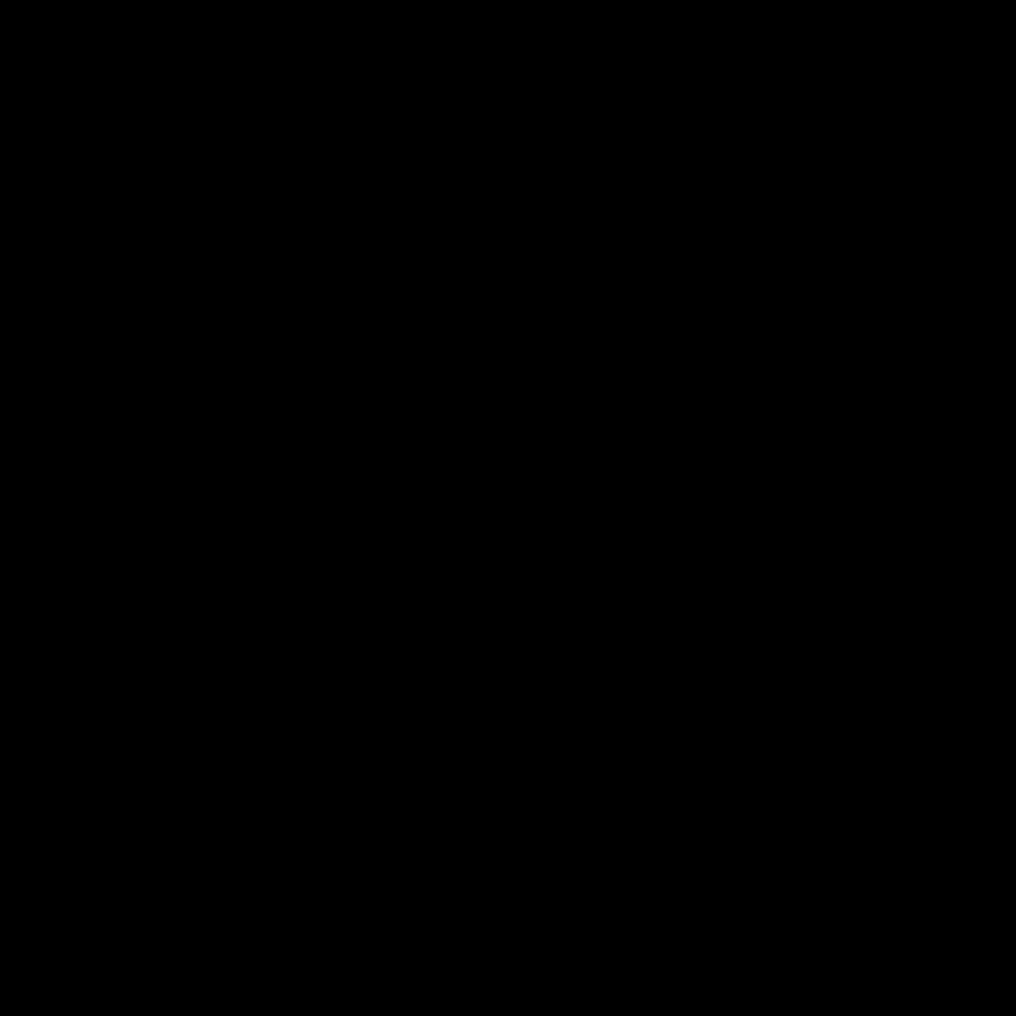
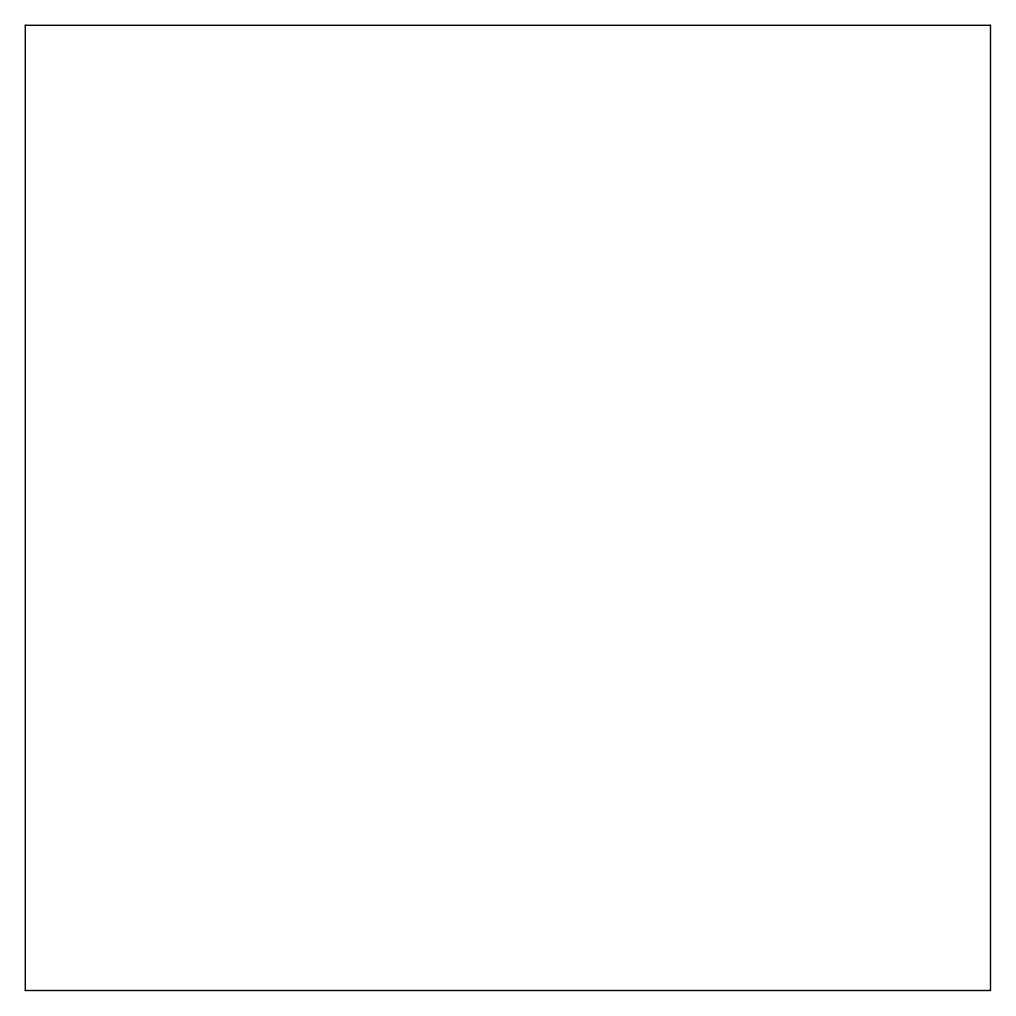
board edge: none -> (25, 25) (990, 25) (990, 990) (25, 990) (25, 25)

